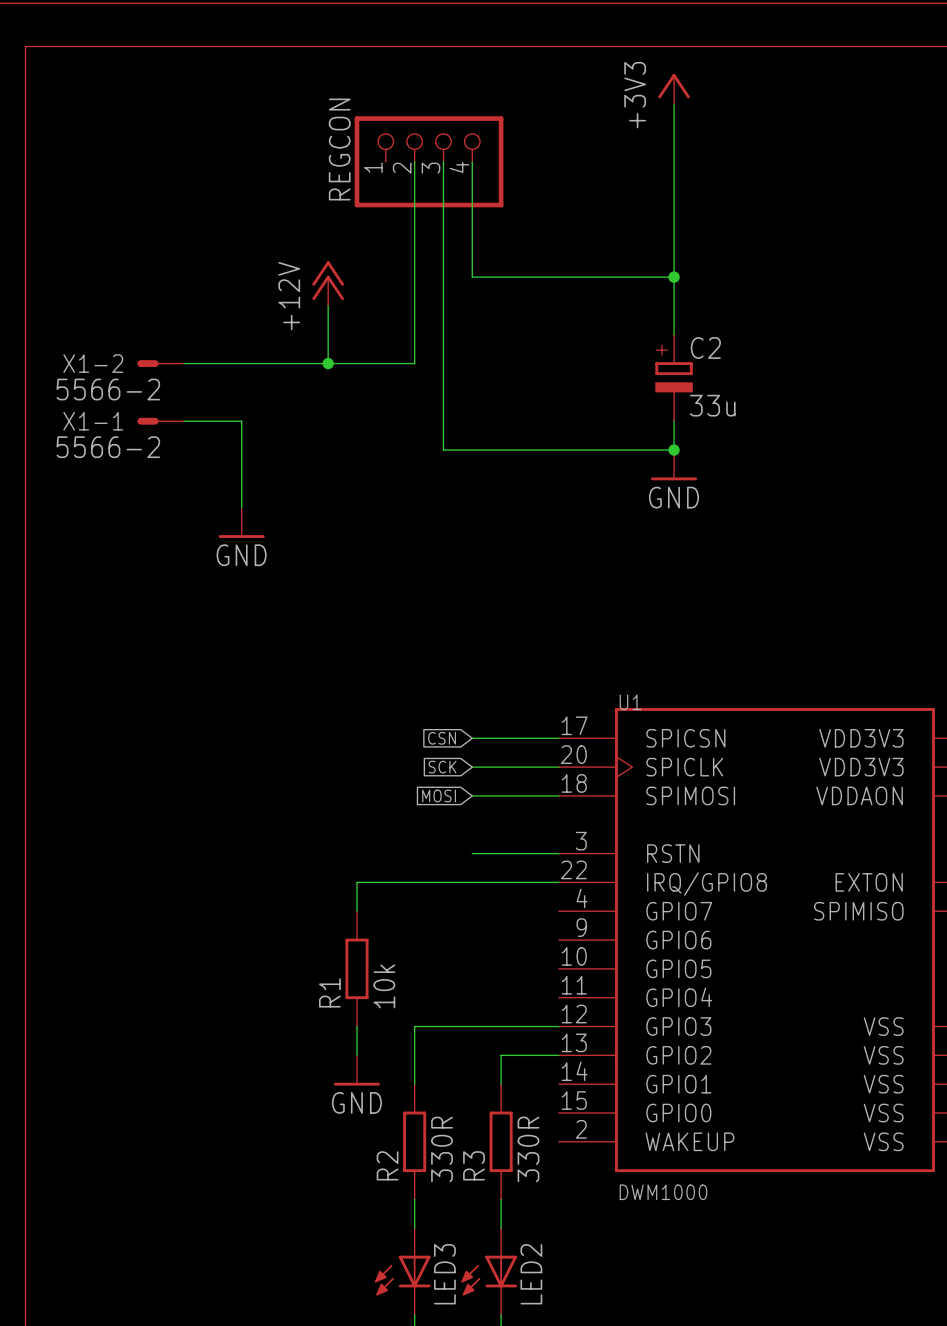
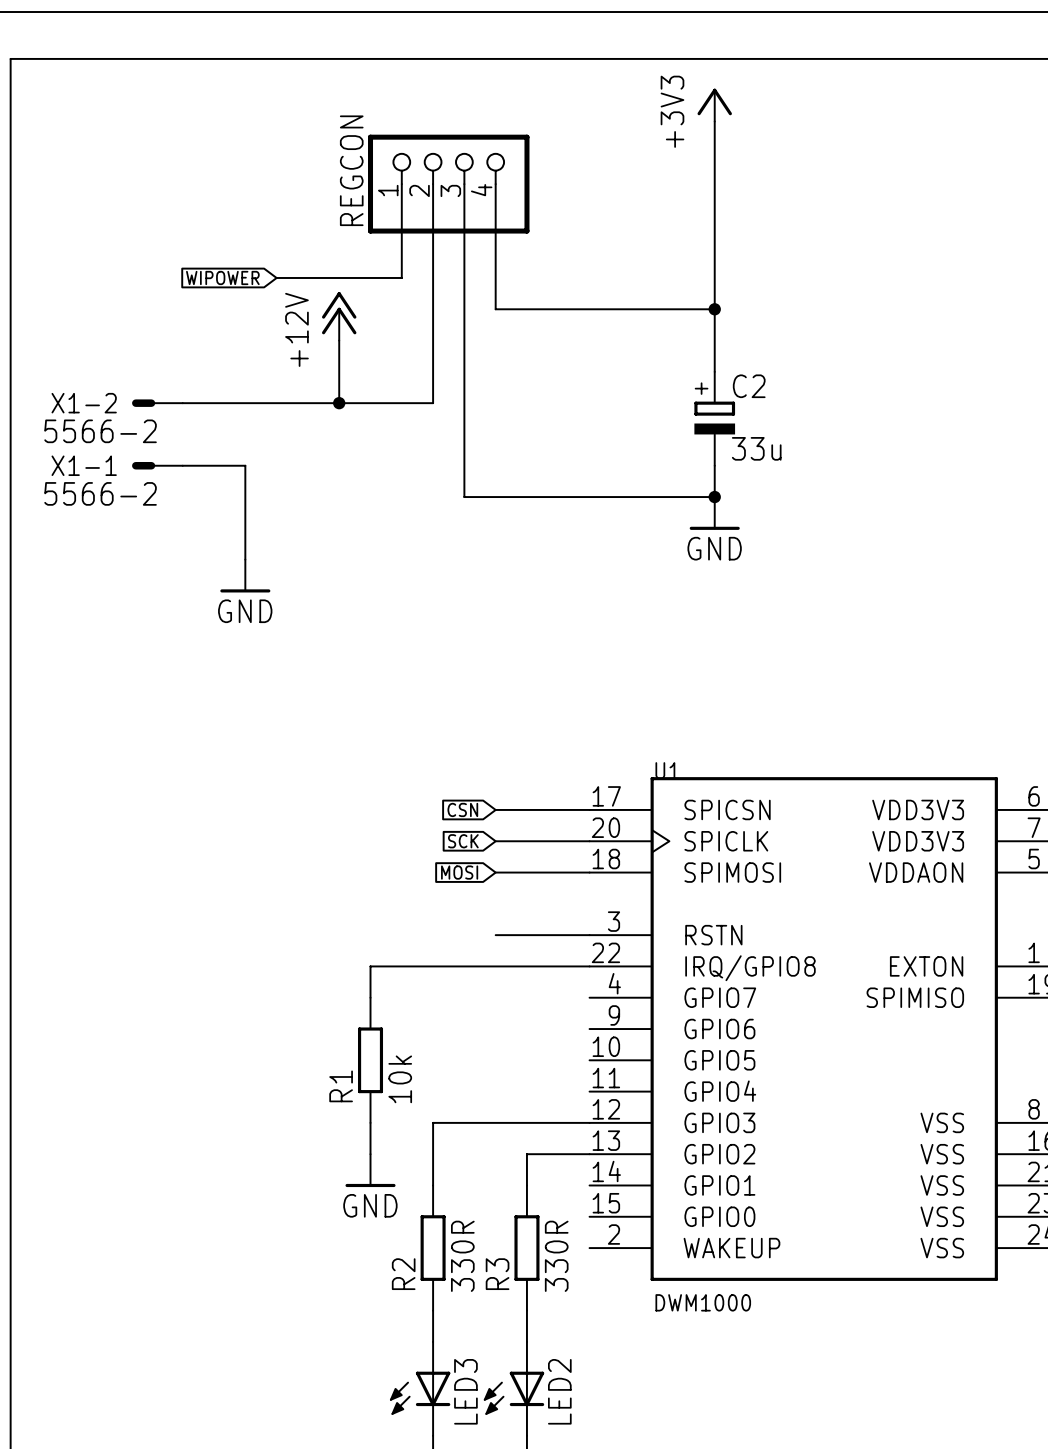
wire: none -> (401, 184) (401, 277) (276, 277)
global label: none -> WIPOWER (222, 277)

